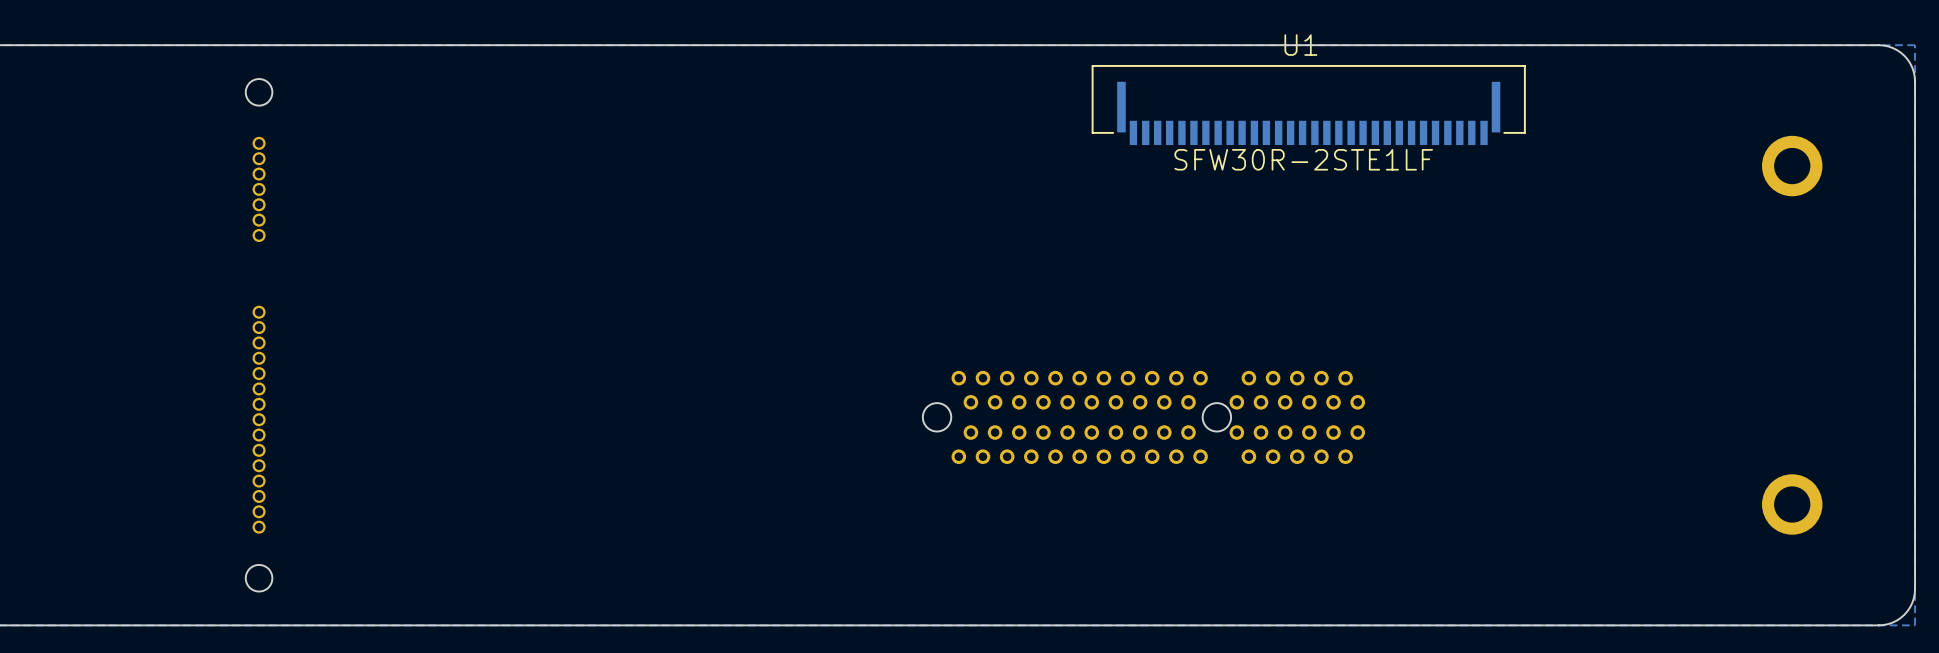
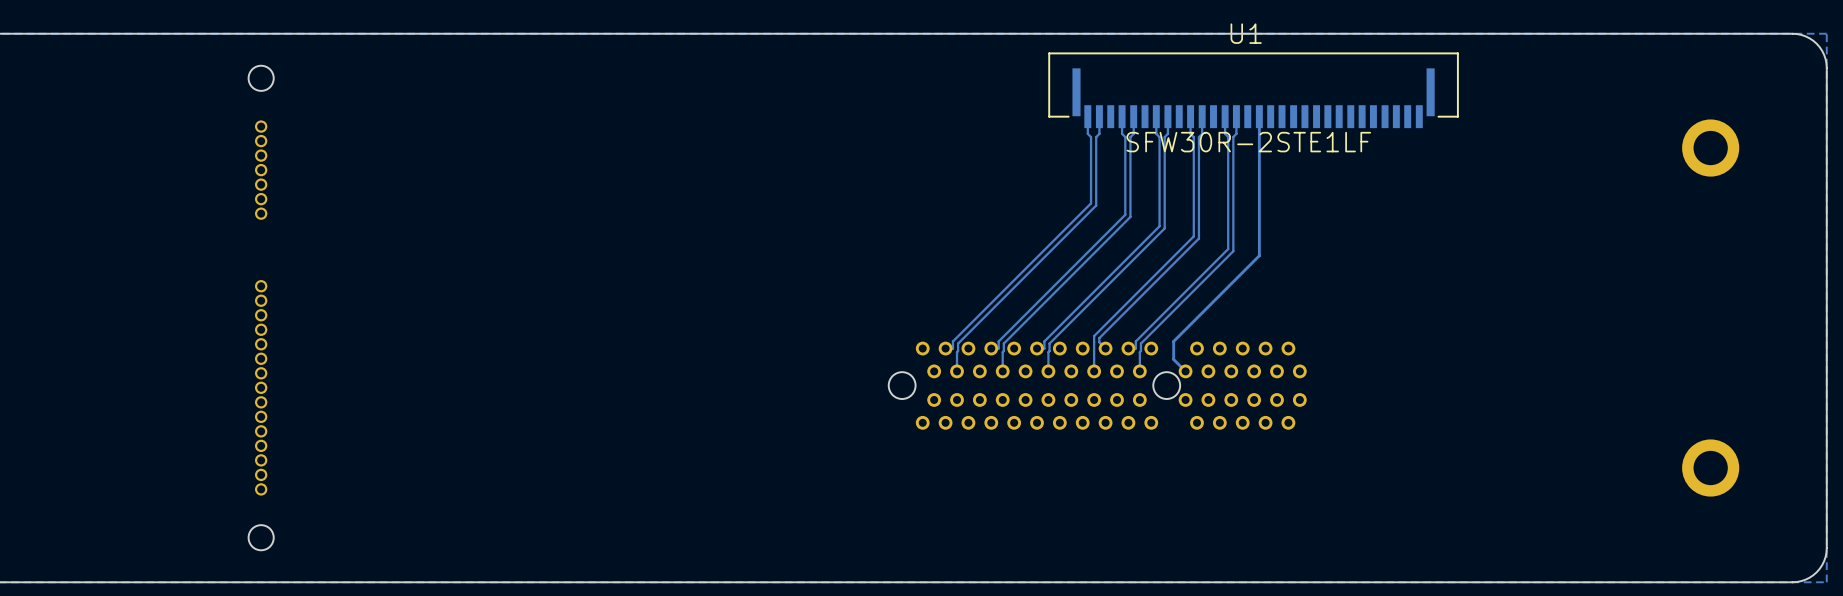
track: none -> (1087, 116) (1087, 133) (1091, 137) (1091, 203) (952, 341) (952, 348) (945, 348)
track: none -> (1099, 116) (1099, 133) (1096, 137) (1096, 205) (958, 343) (957, 371)
track: none -> (1122, 116) (1122, 133) (1125, 137) (1125, 214) (998, 341) (998, 348) (991, 348)
track: none -> (1133, 116) (1133, 133) (1130, 137) (1130, 216) (1003, 343) (1002, 371)
track: none -> (1156, 116) (1156, 133) (1159, 137) (1159, 226) (1044, 341) (1044, 348) (1037, 348)
track: none -> (1167, 116) (1167, 133) (1164, 137) (1164, 228) (1049, 343) (1048, 371)
track: none -> (1190, 116) (1190, 133) (1193, 137) (1193, 236) (1094, 336) (1094, 371)
track: none -> (1202, 116) (1202, 133) (1198, 137) (1198, 238) (1099, 338) (1099, 342) (1105, 348)
track: none -> (1225, 116) (1225, 133) (1228, 136) (1228, 249) (1135, 341) (1135, 348) (1128, 348)
track: none -> (1236, 116) (1236, 133) (1233, 136) (1233, 251) (1140, 343) (1139, 371)
track: none -> (1259, 116) (1259, 255) (1173, 341) (1173, 359) (1185, 371)

